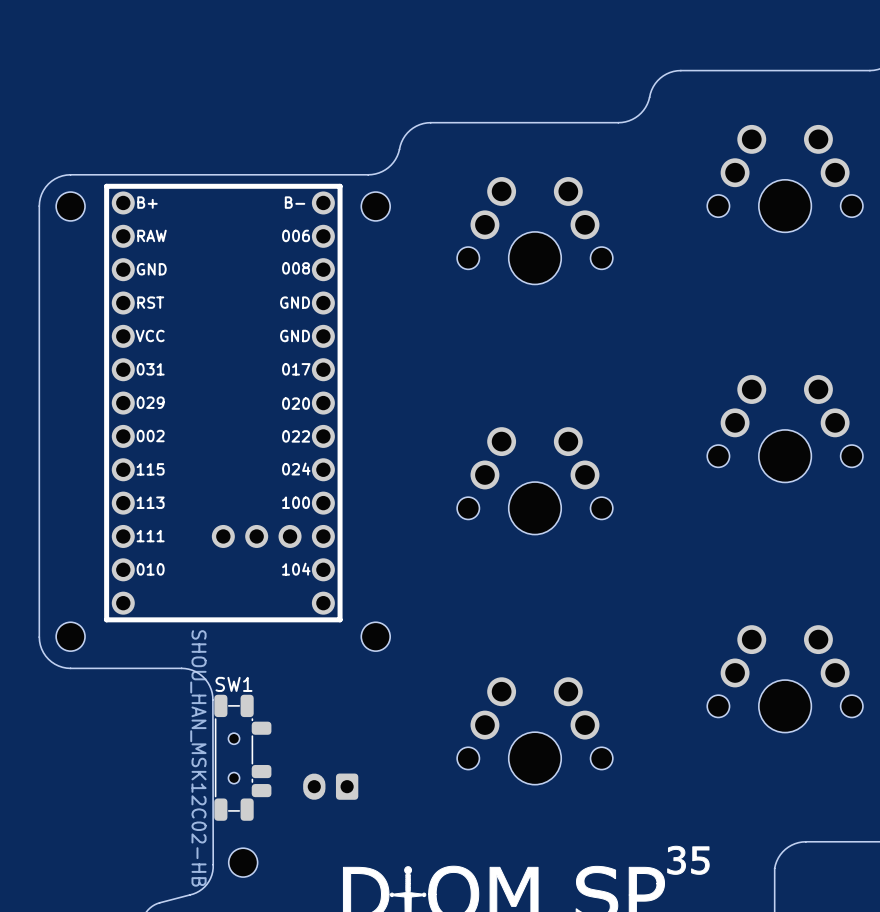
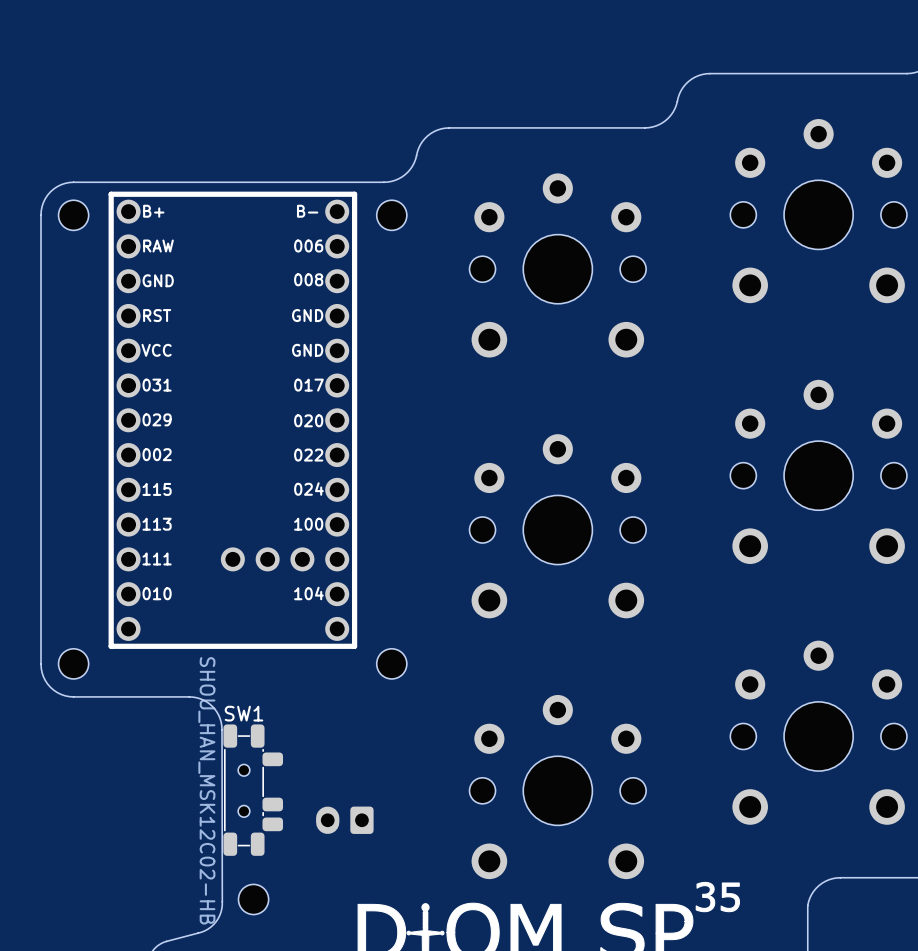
part: (785, 178) -> none
part: none -> (818, 211)
part: (534, 230) -> none
part: none -> (557, 265)
part: (785, 428) -> none
part: none -> (818, 471)
part: (534, 480) -> none
part: none -> (557, 526)
part: (785, 678) -> none
part: none -> (818, 732)
part: (534, 730) -> none
part: none -> (557, 787)

